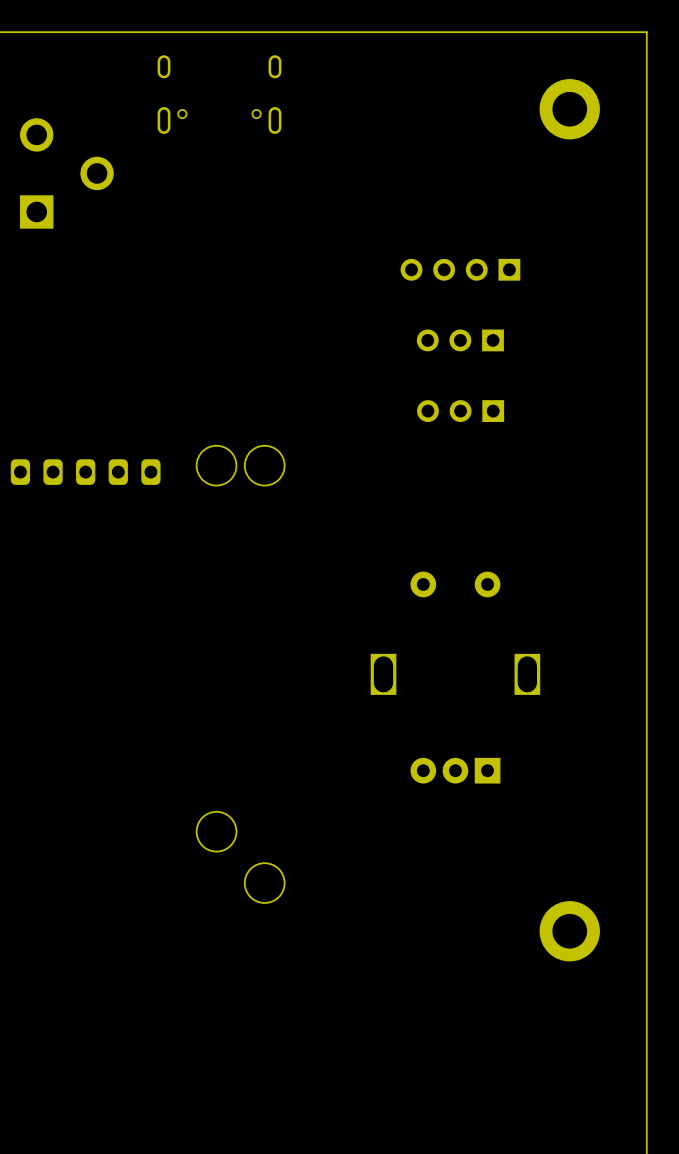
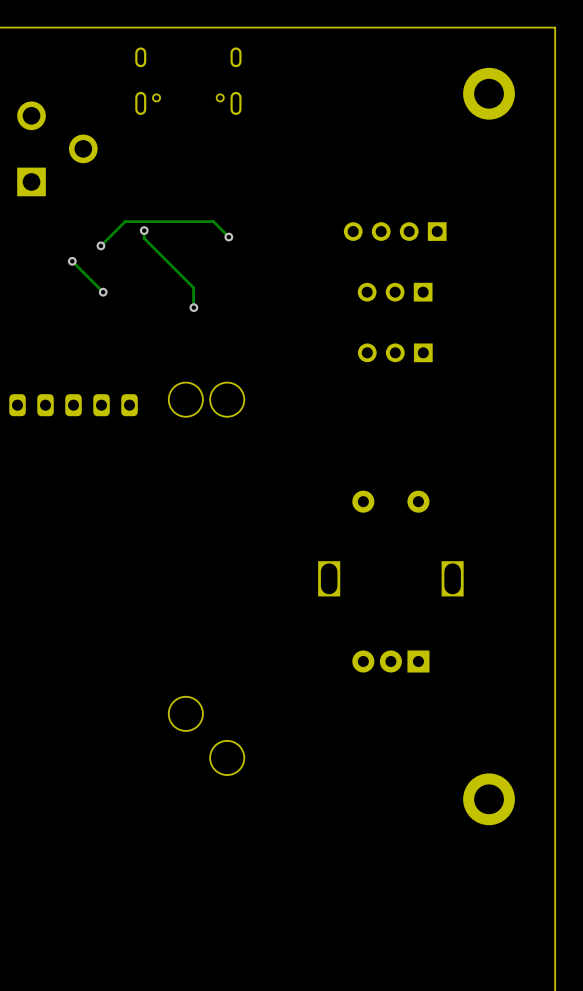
track: none -> (144, 230) (144, 238) (193, 287) (193, 307)
via: none -> (144, 230)
track: none -> (228, 237) (213, 221) (125, 221) (100, 245)
via: none -> (228, 237)
via: none -> (100, 245)
track: none -> (72, 261) (103, 292)
via: none -> (72, 261)
via: none -> (103, 292)
via: none -> (193, 307)

